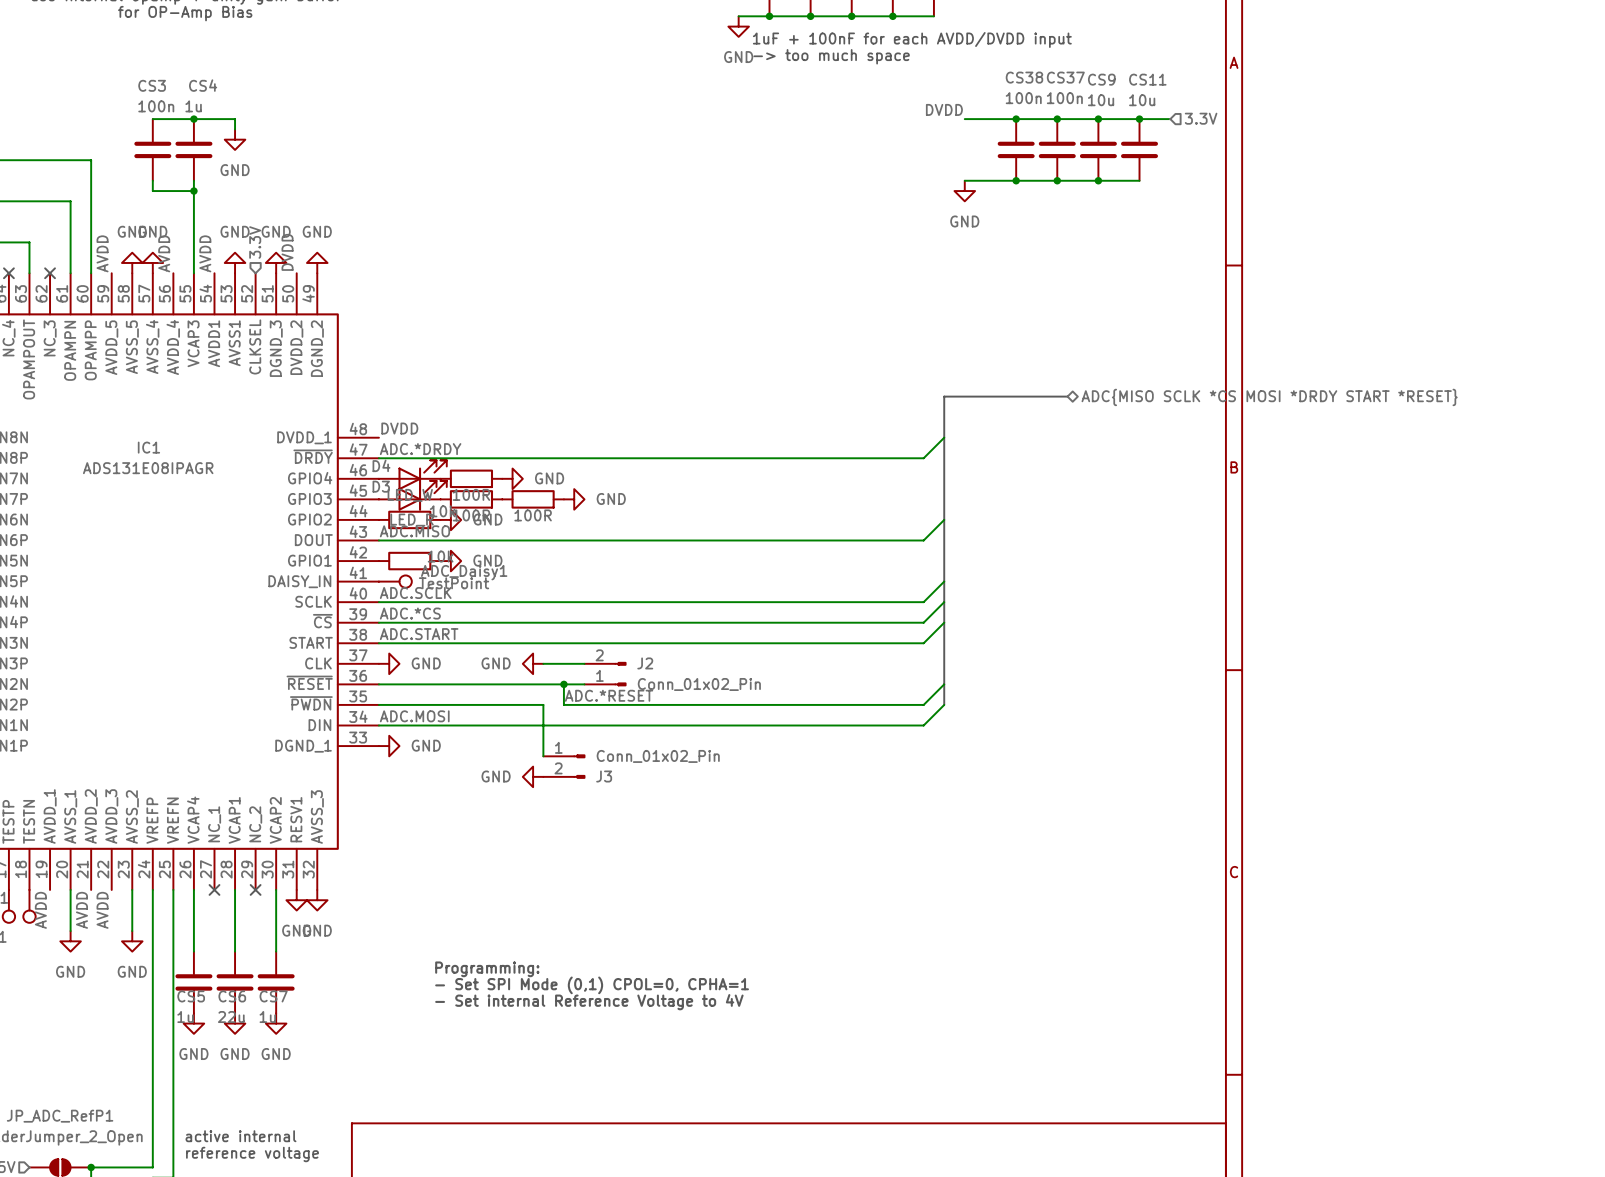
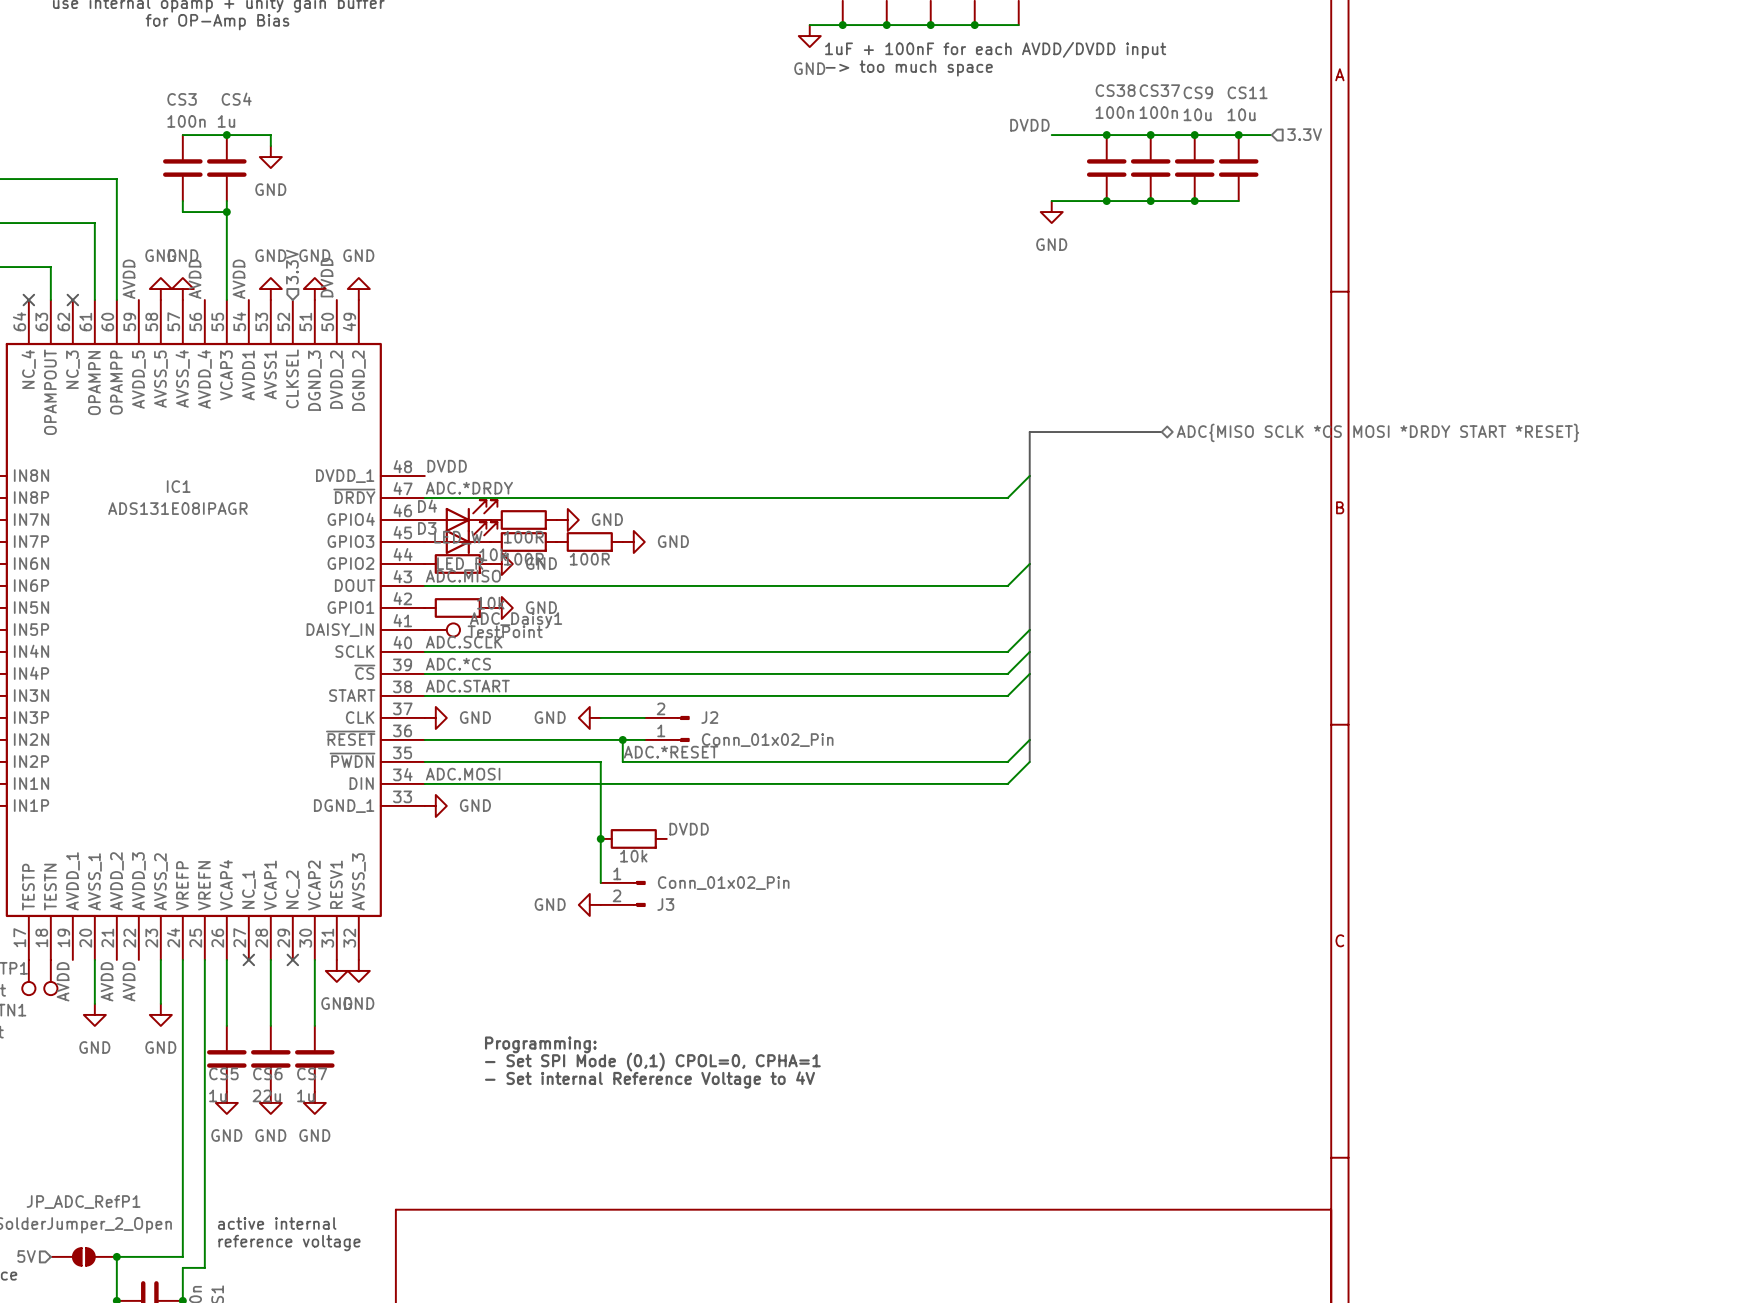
wire: none -> (600, 816) (600, 882)
J3 position: (564, 766) -> (623, 893)
label: none -> DVDD (689, 829)
power symbol position: GND (533, 776) -> GND (589, 904)
junction: none -> (600, 838)
part: none -> 10k (633, 838)

